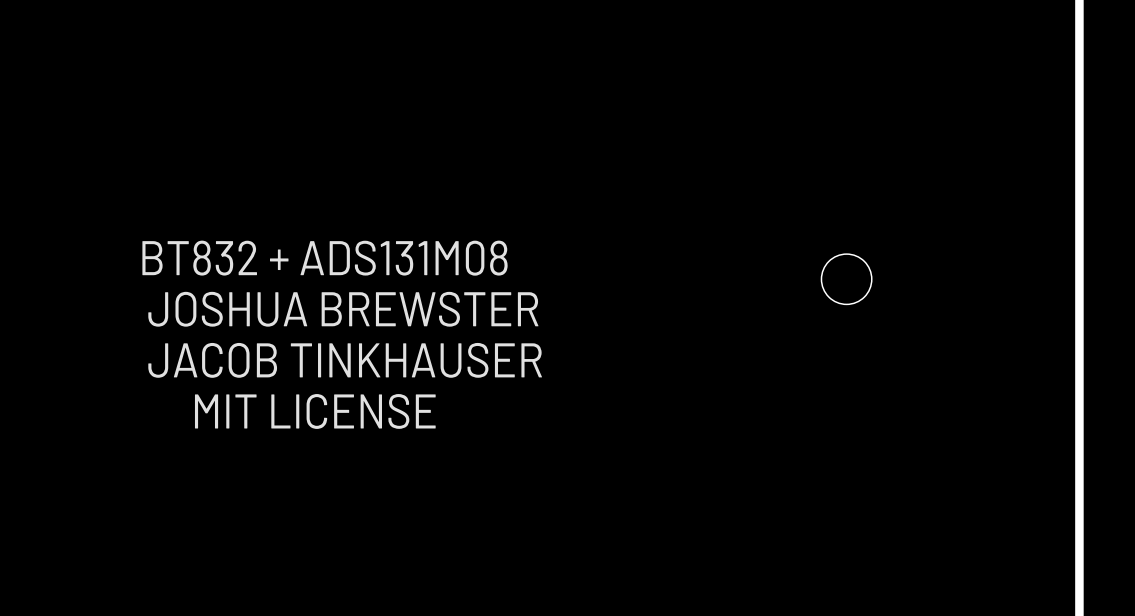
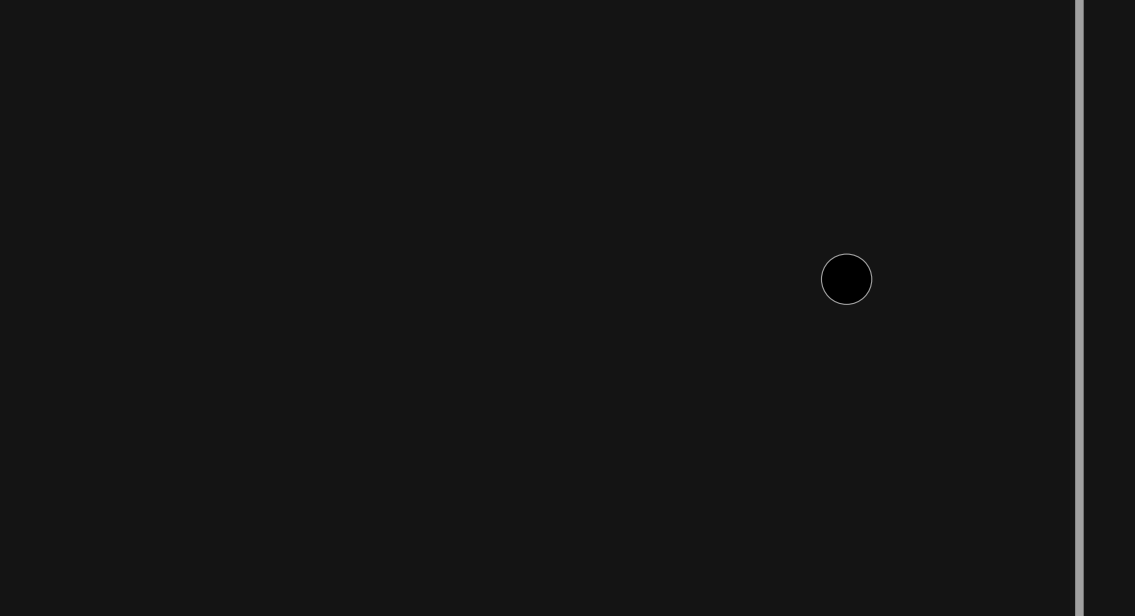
text: BT832 + ADS131M08 (325, 258) -> none
text: JOSHUA BREWSTER (343, 309) -> none
text: JACOB TINKHAUSER (345, 360) -> none
text: MIT LICENSE (315, 411) -> none

